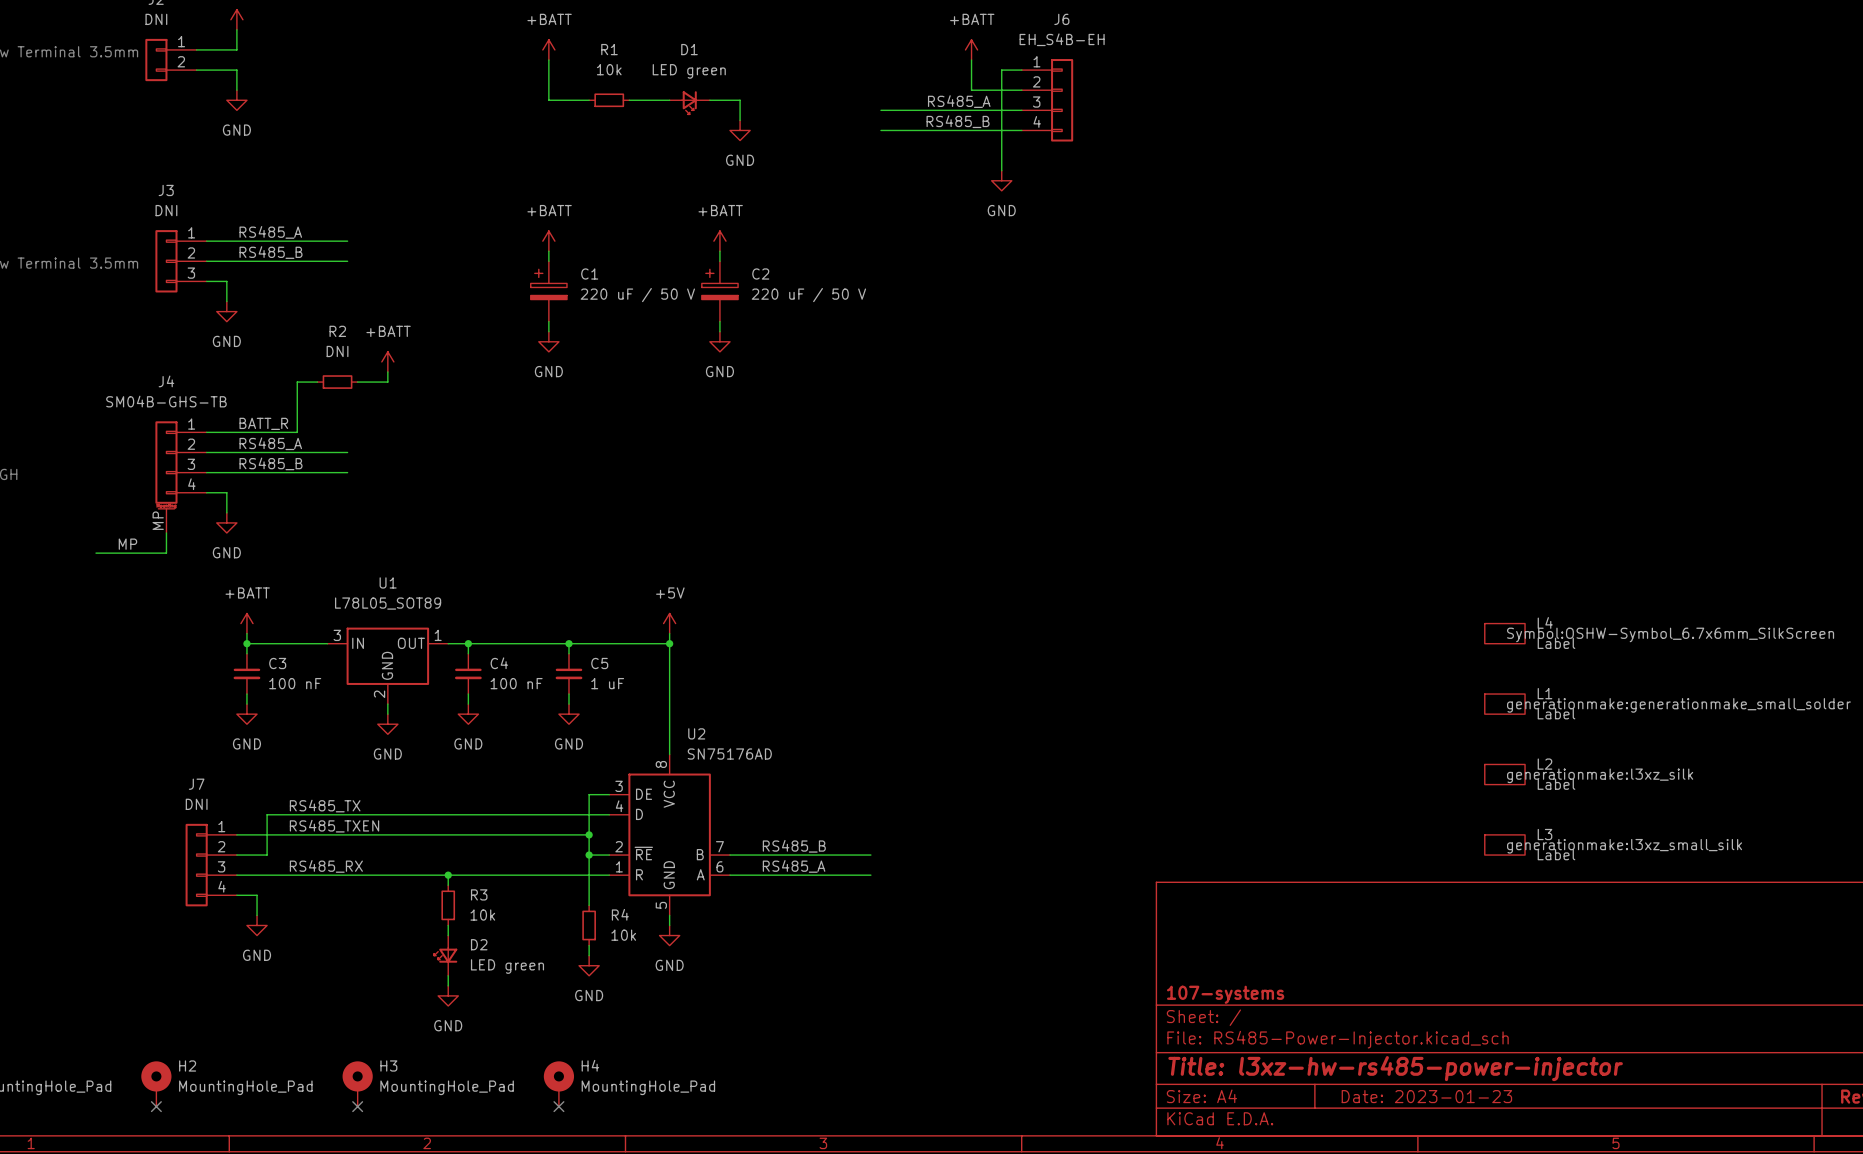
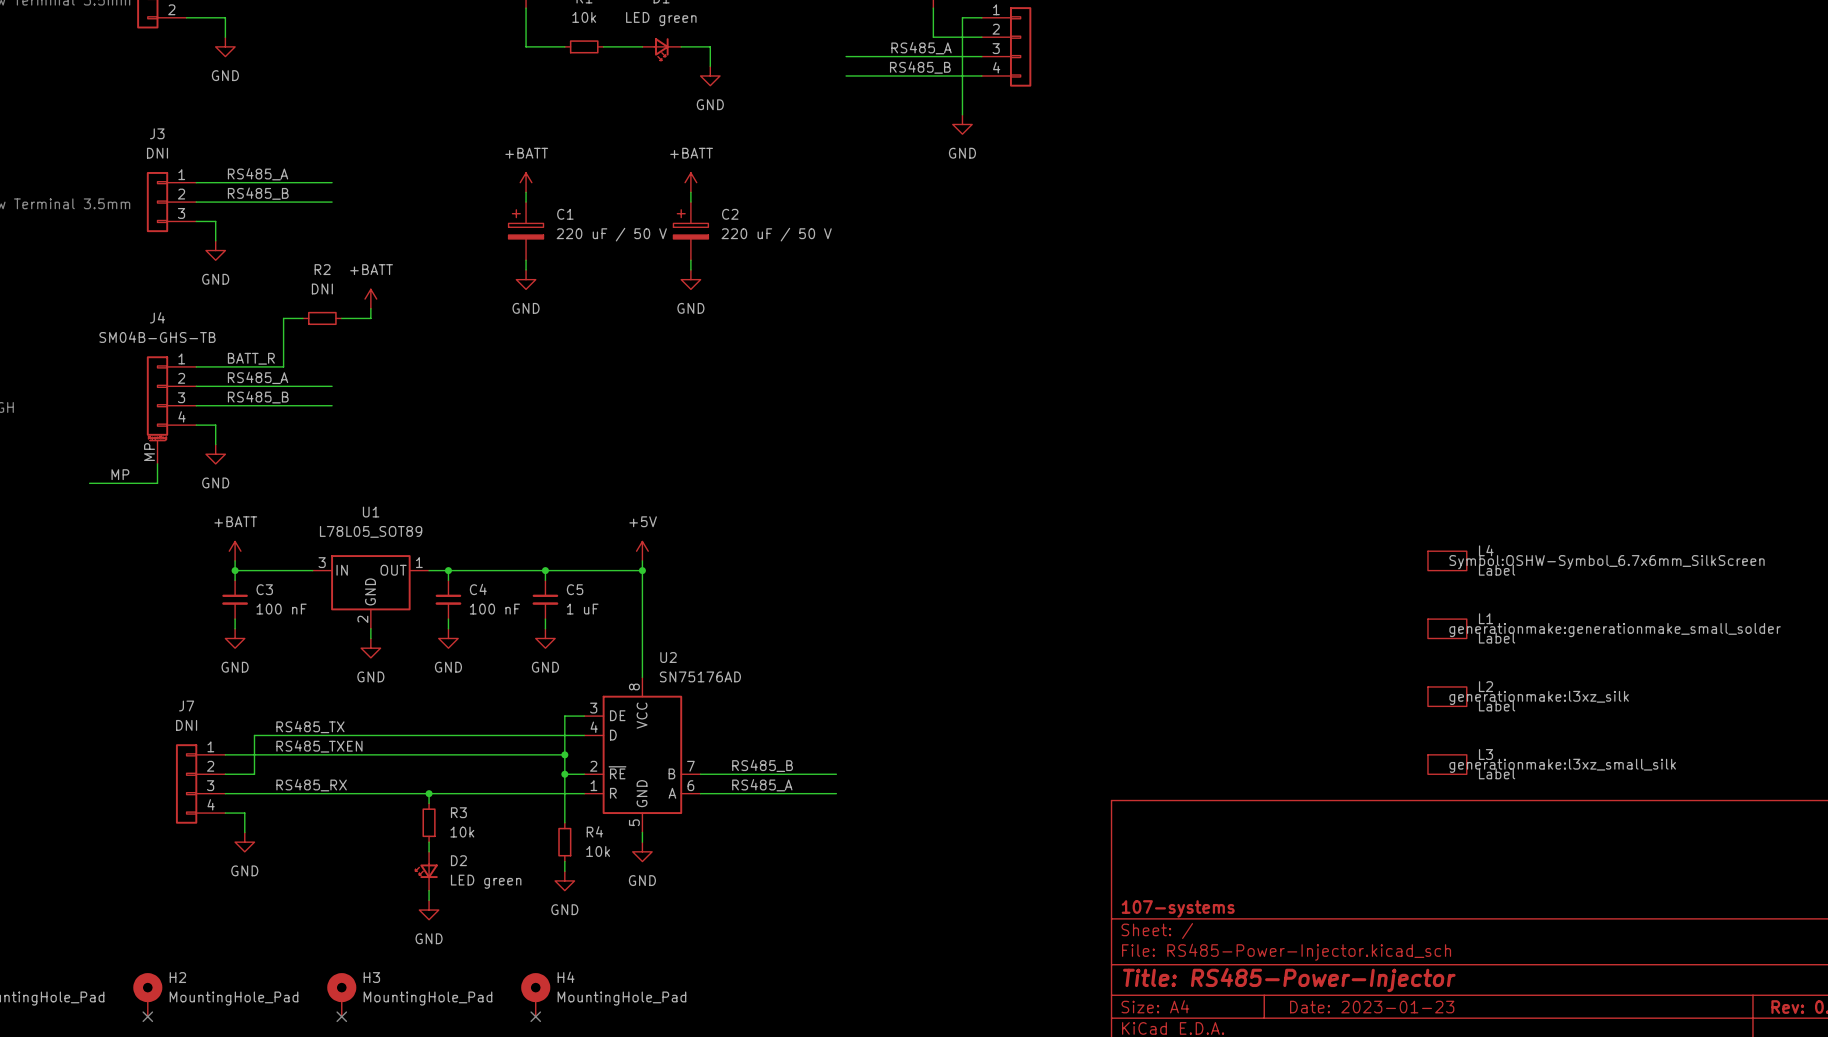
title block: Title: l3xz-hw-rs485-power-injector (1395, 1068) -> Title: RS485-Power-Injector (1289, 980)

